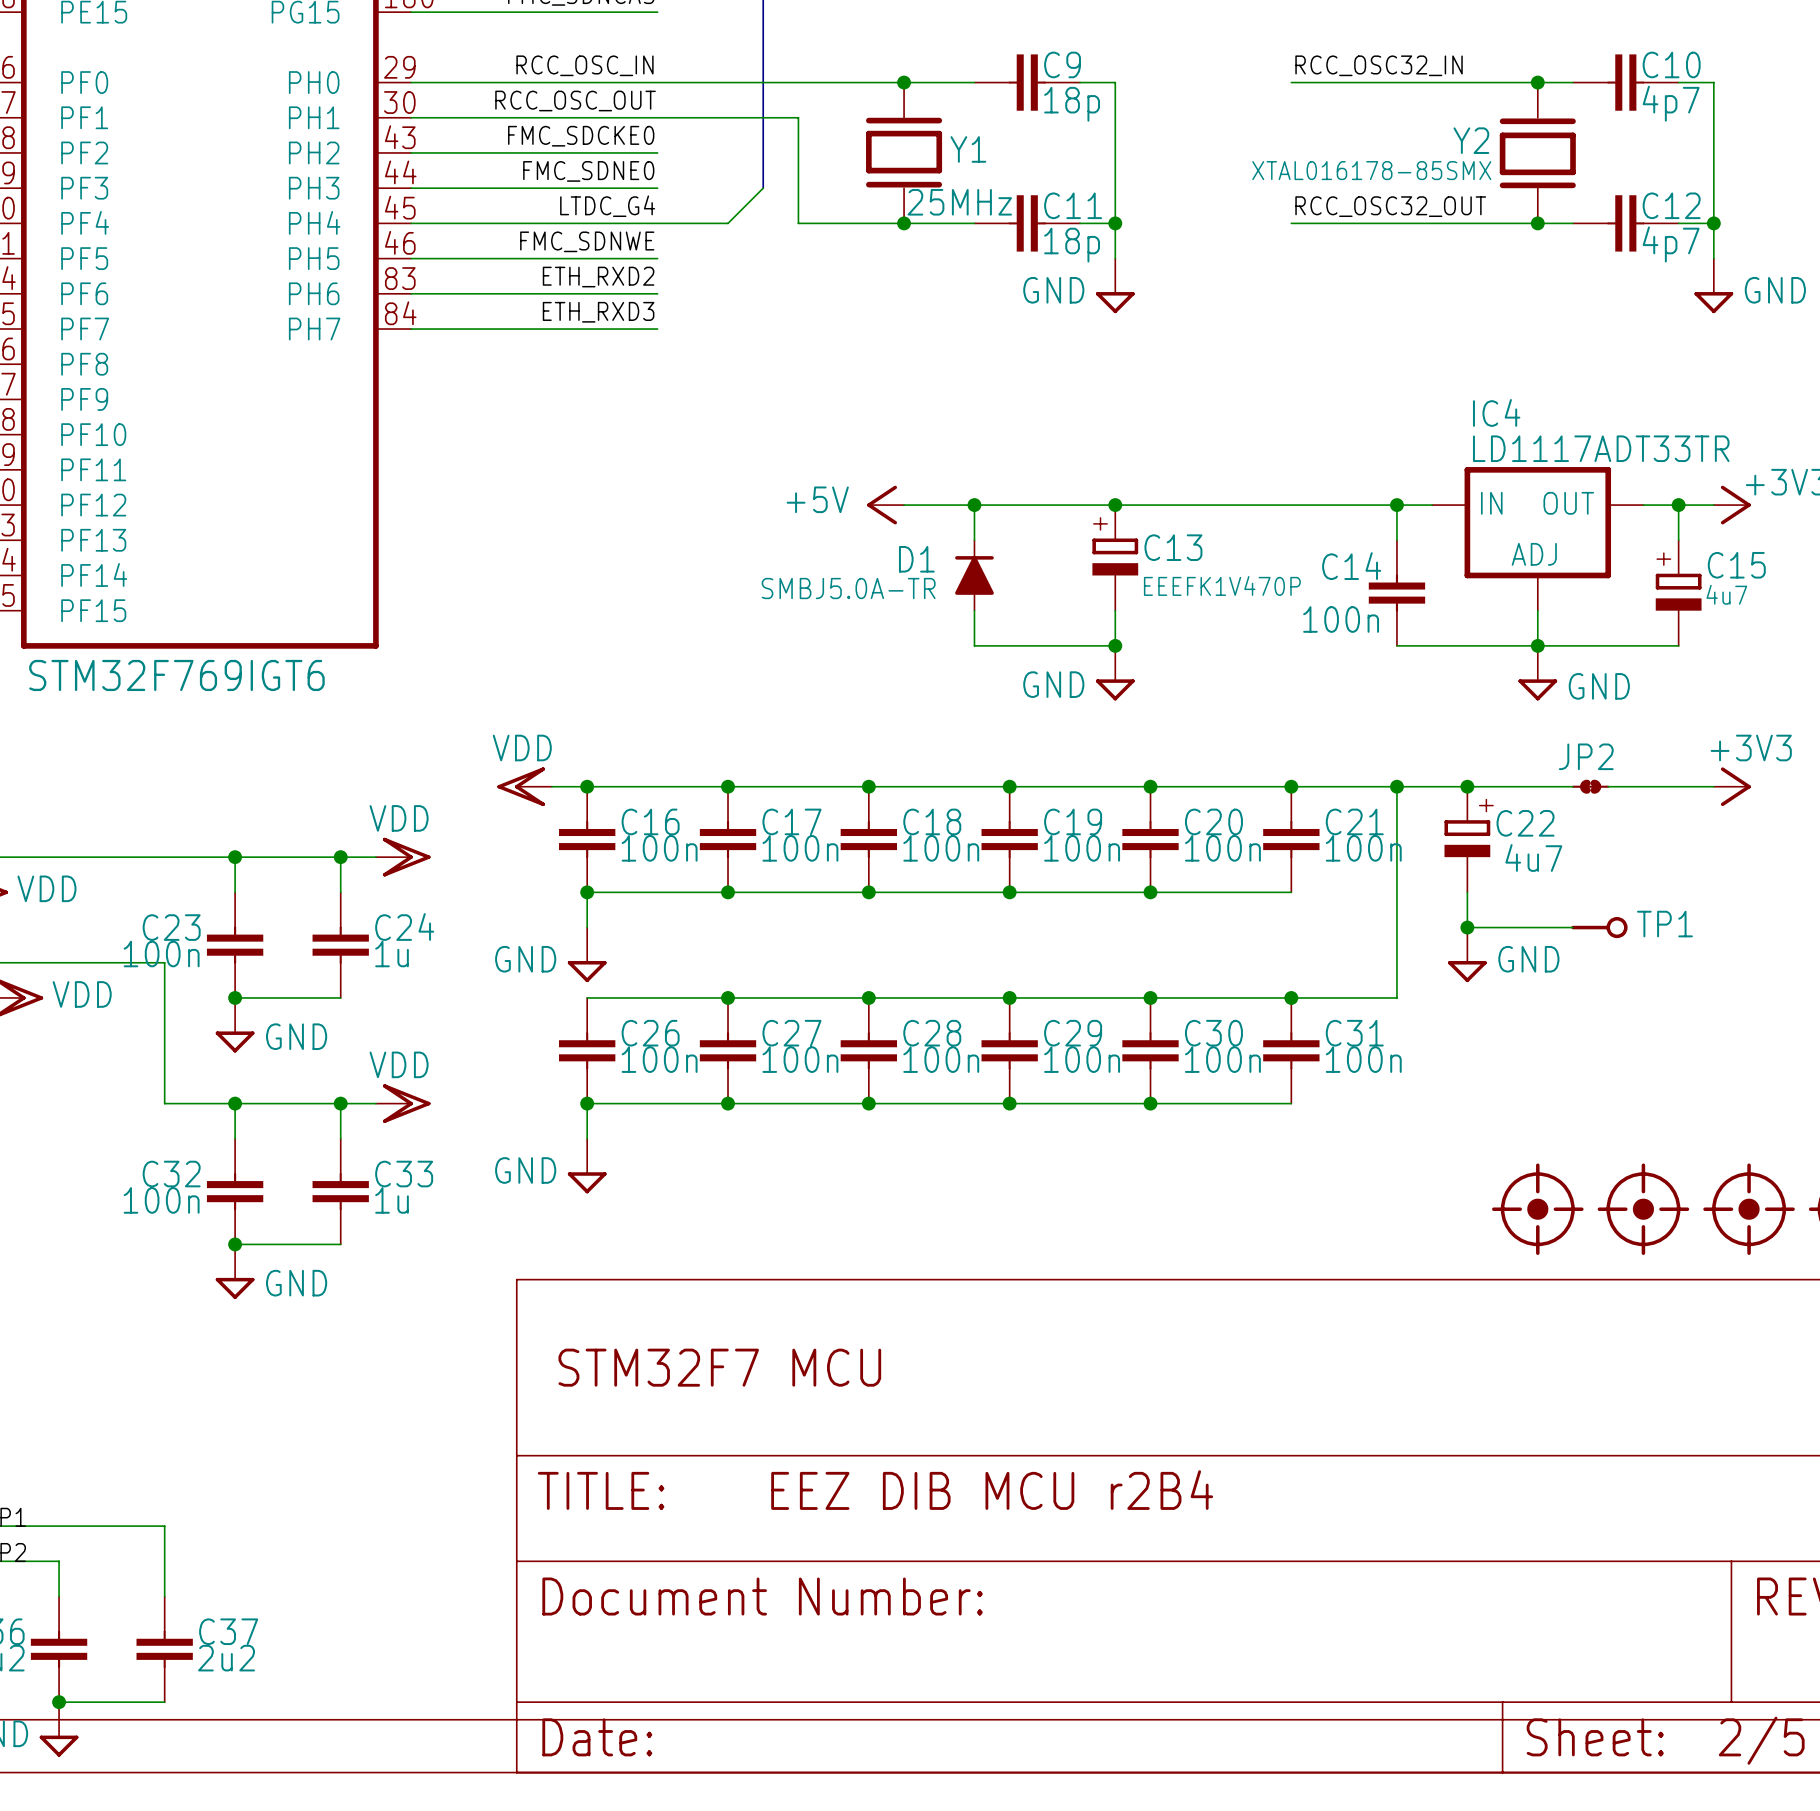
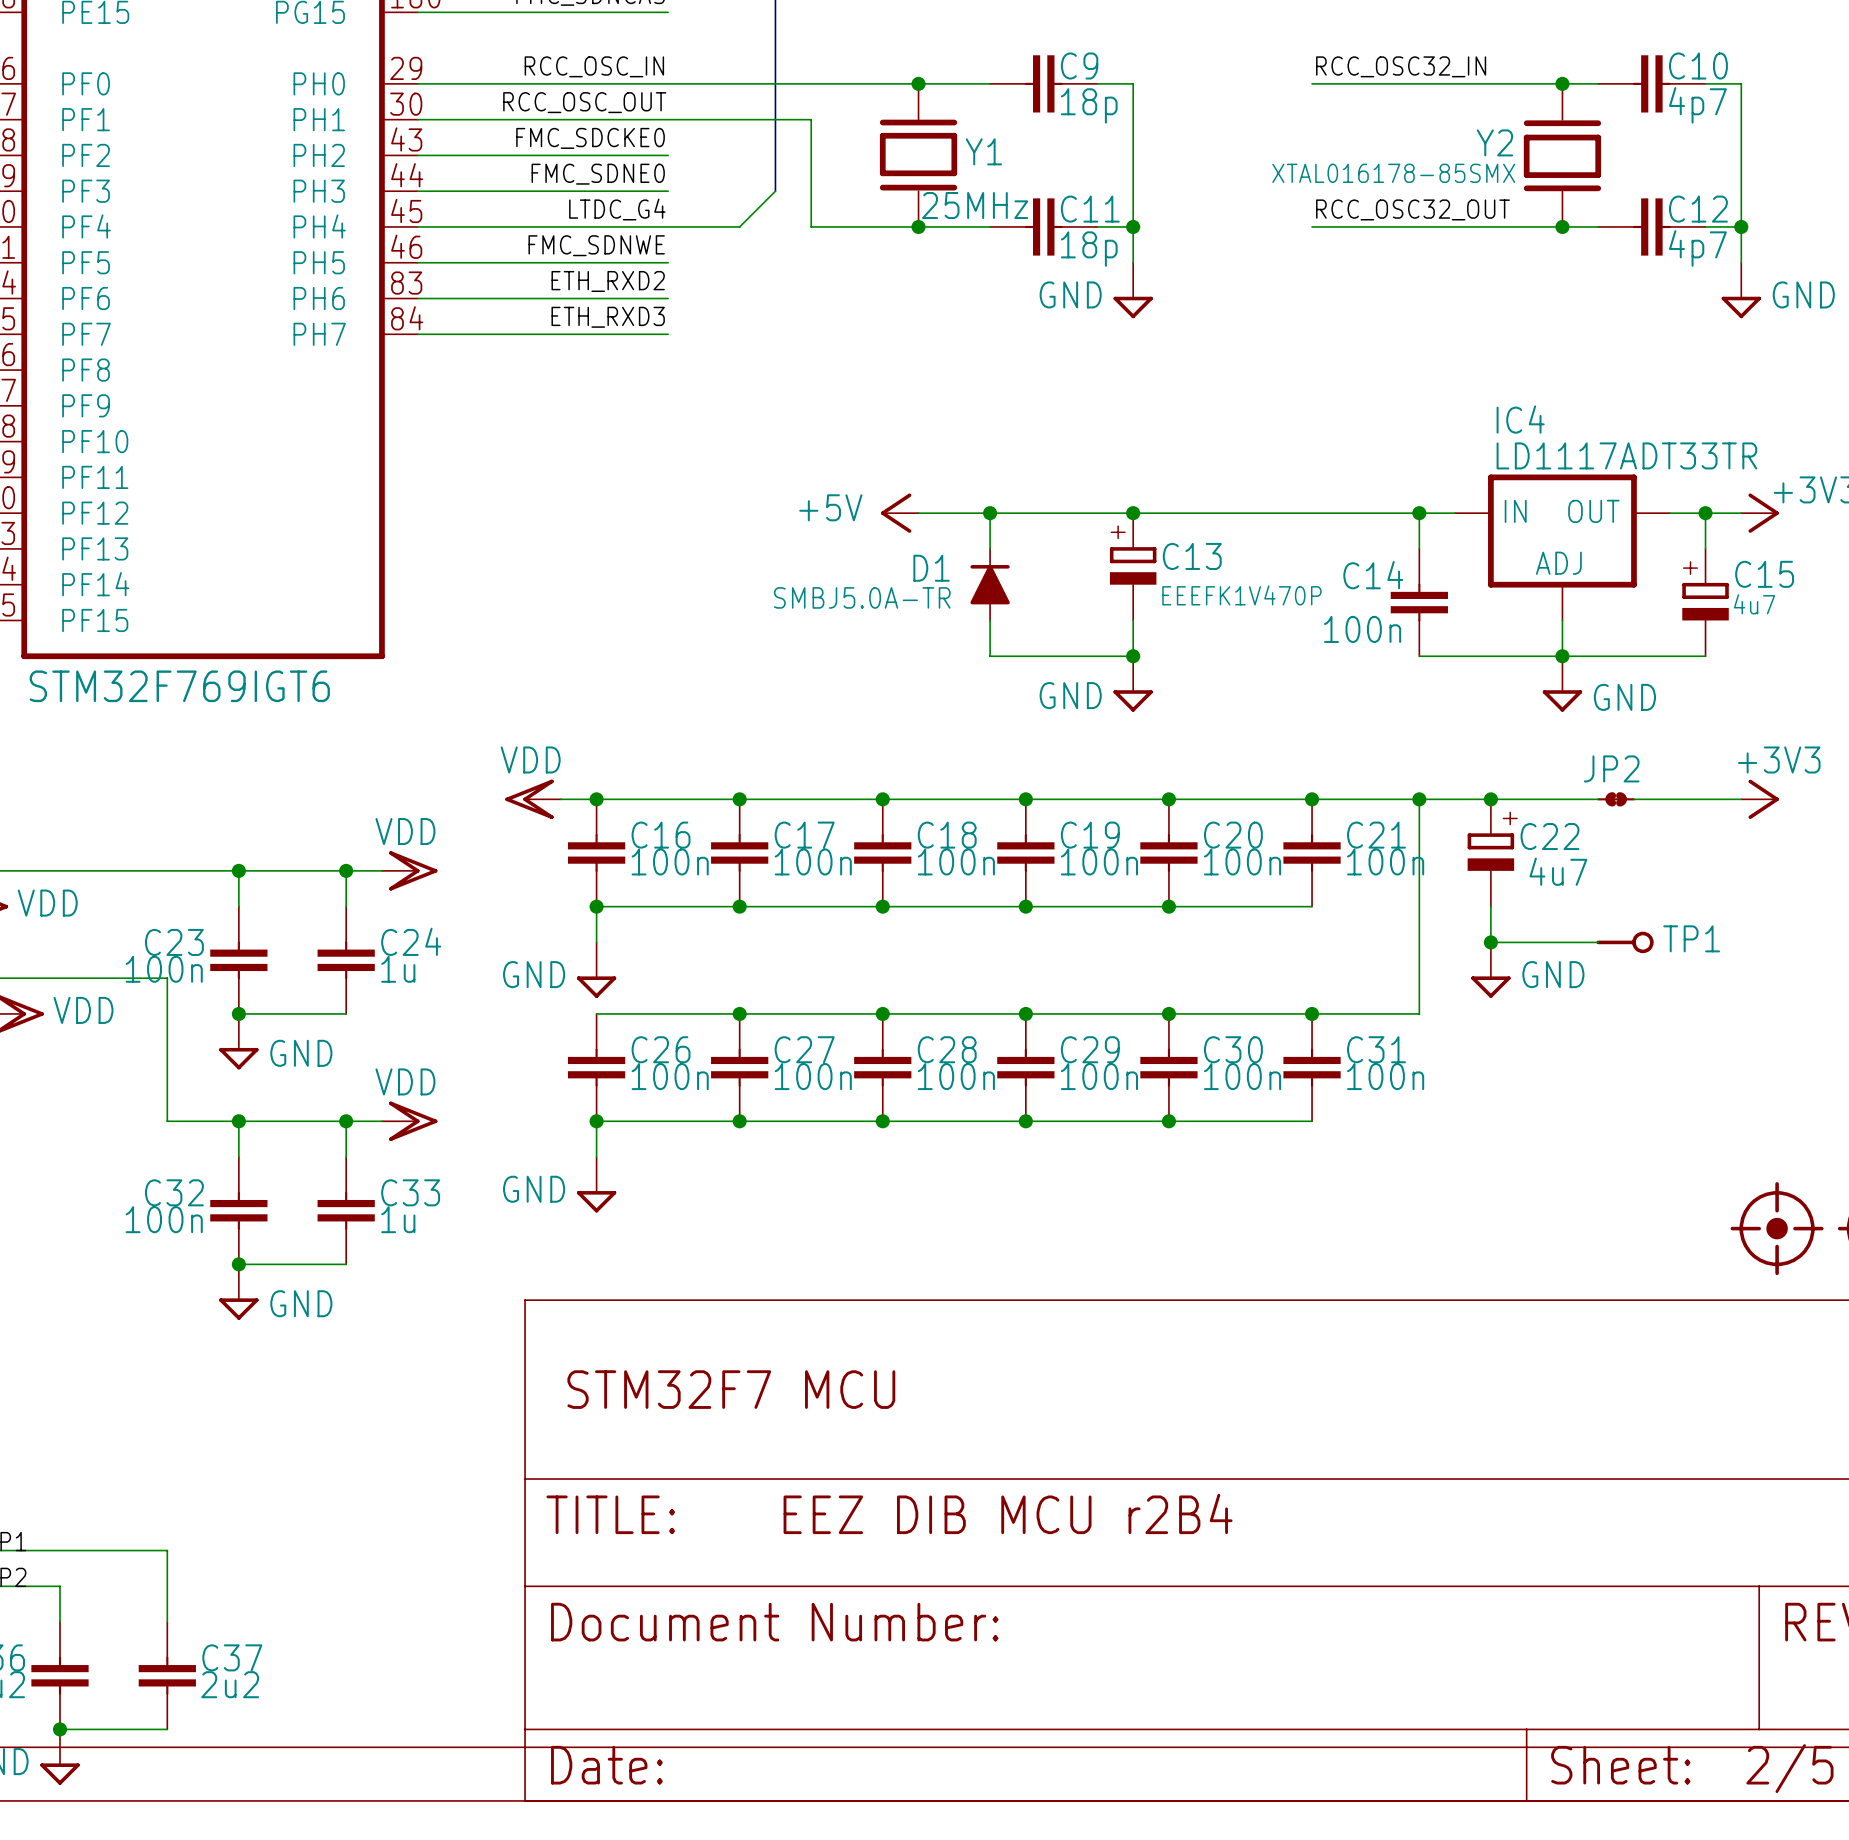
part: (1537, 1209) -> none
part: (1643, 1209) -> none

